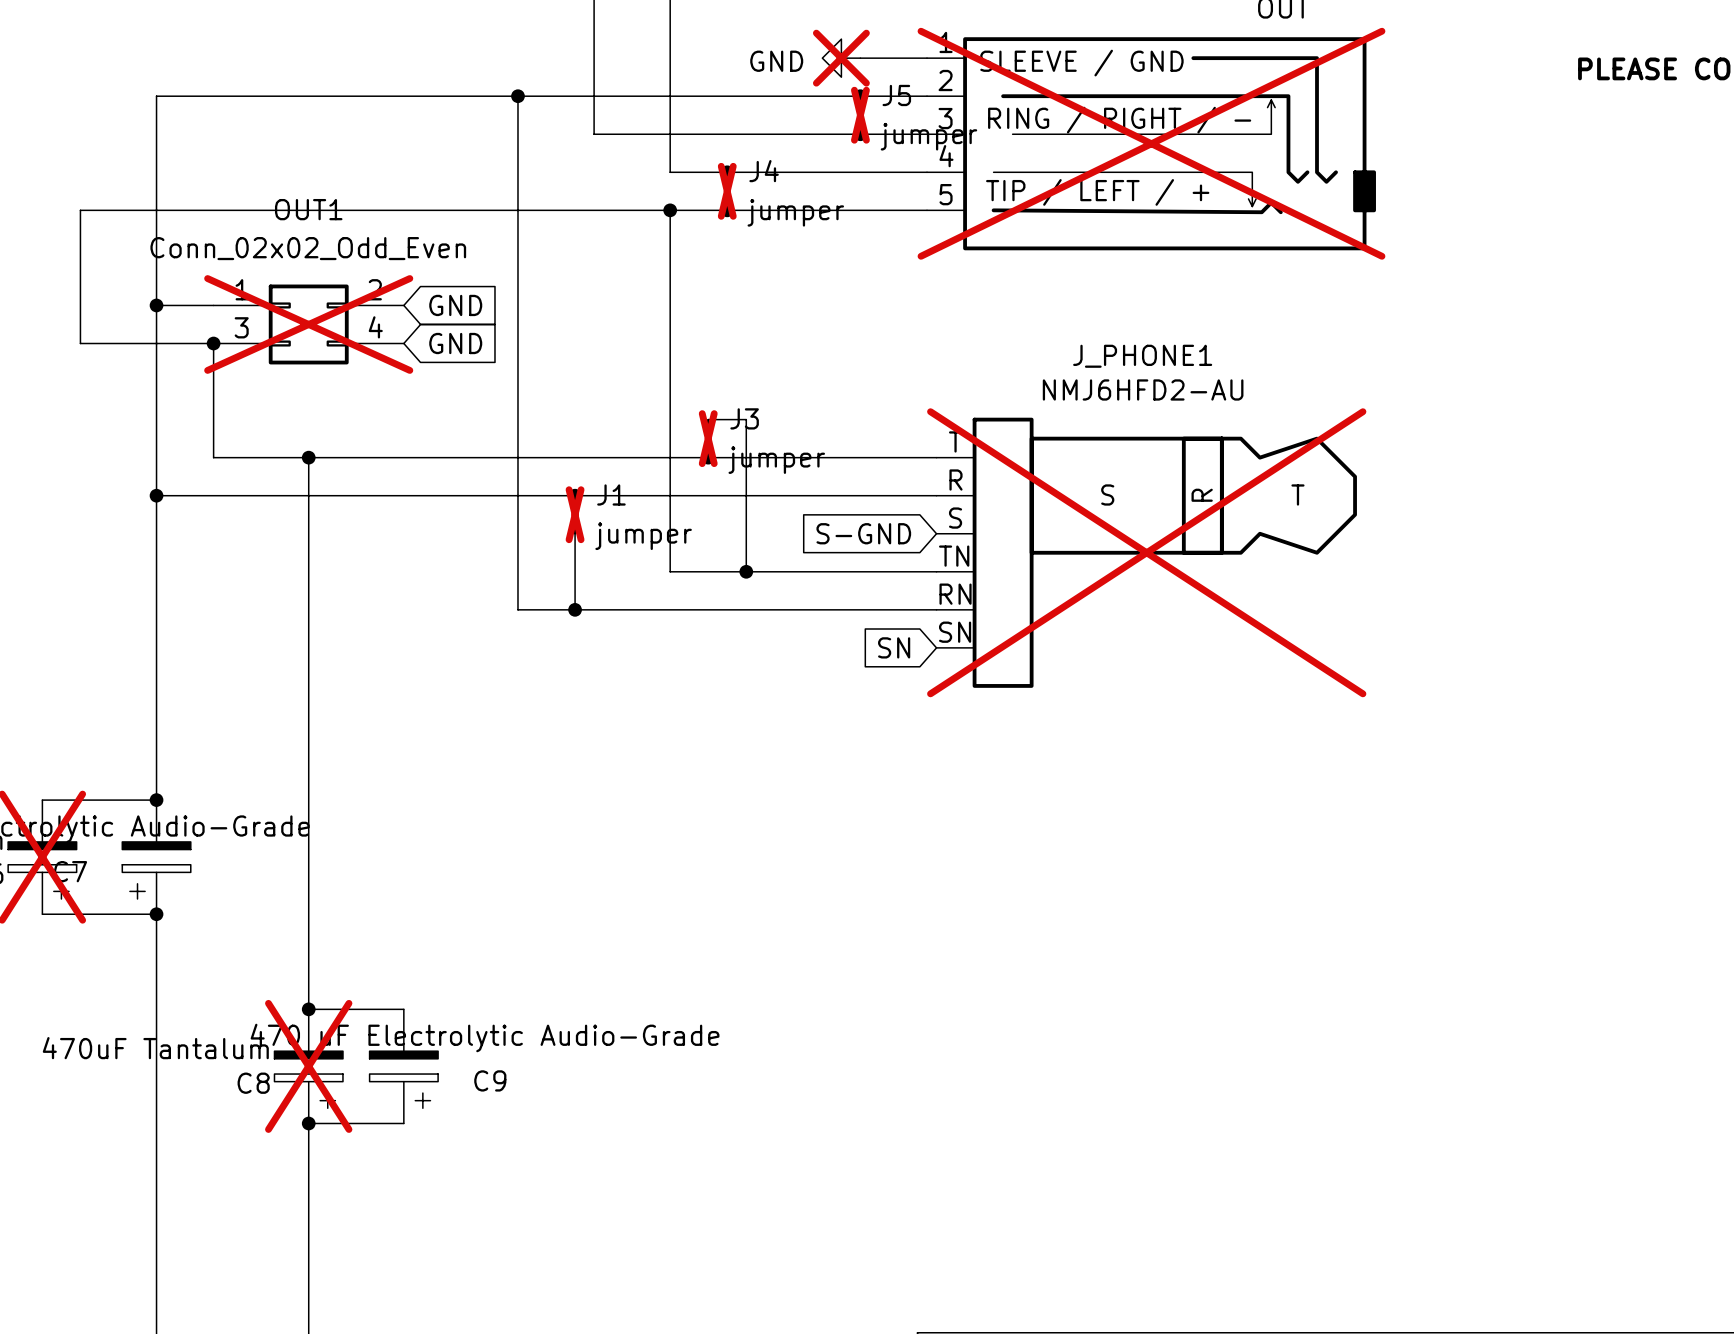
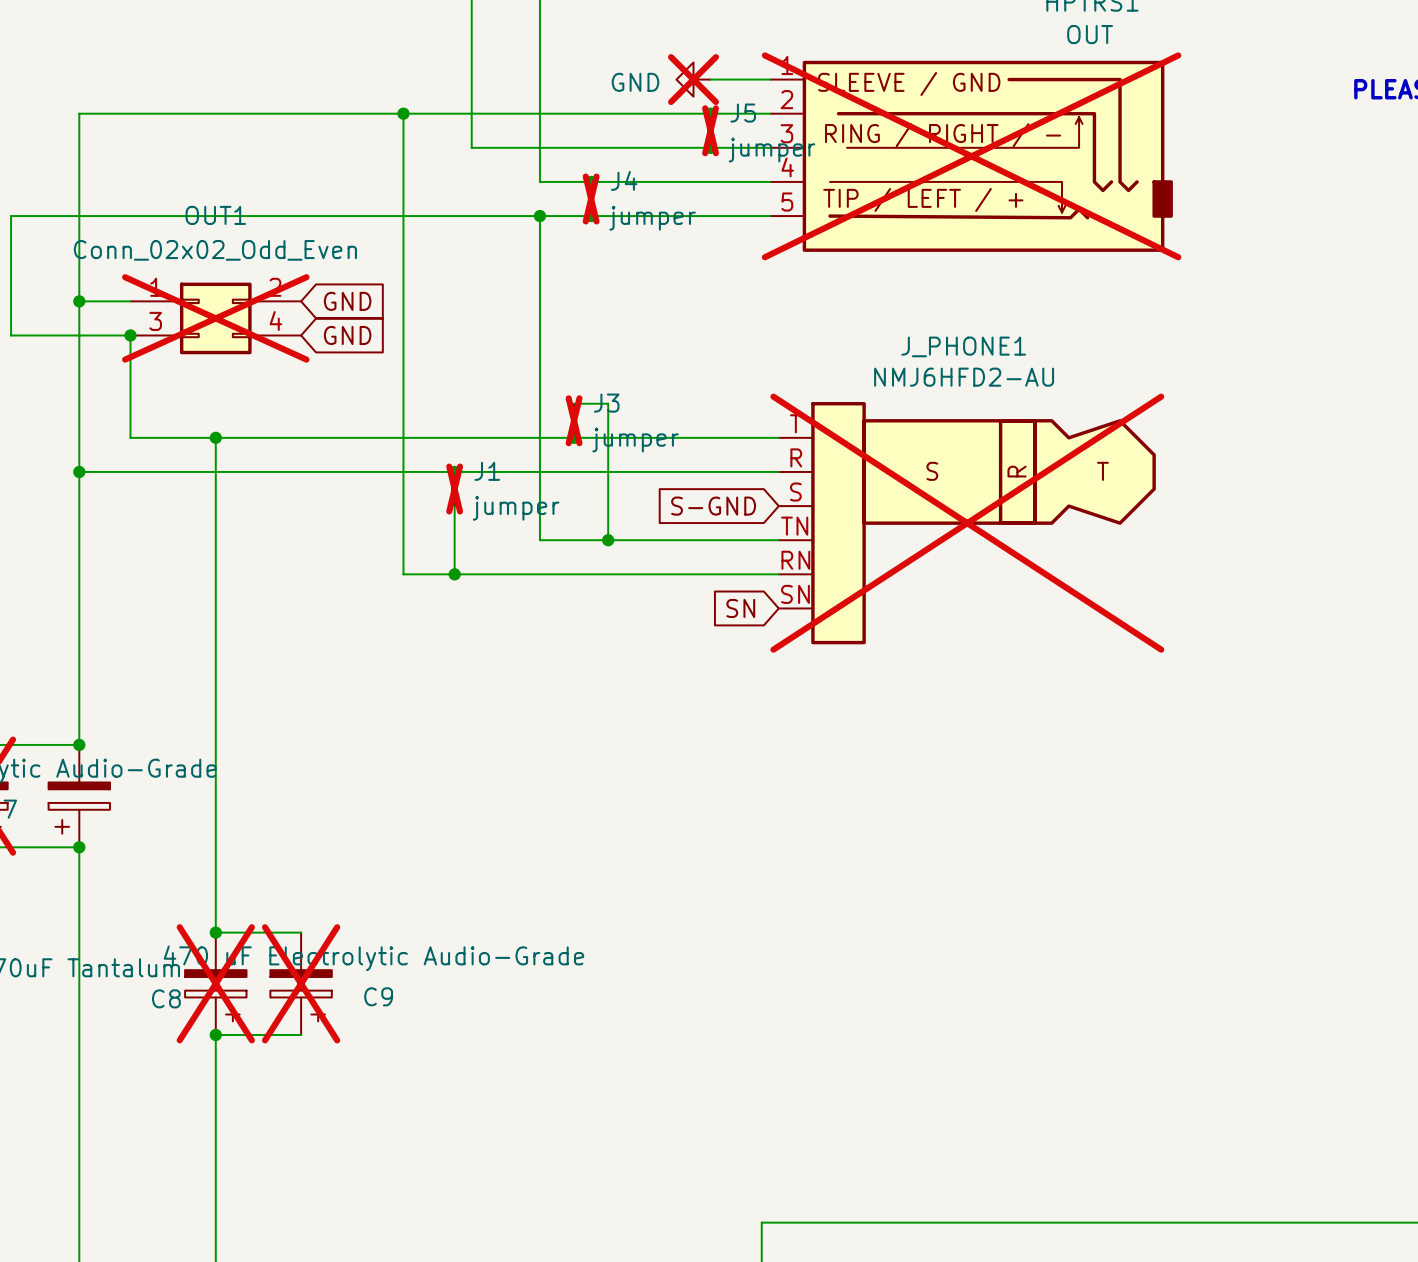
C9 do-not-place cross: none -> (301, 983)

